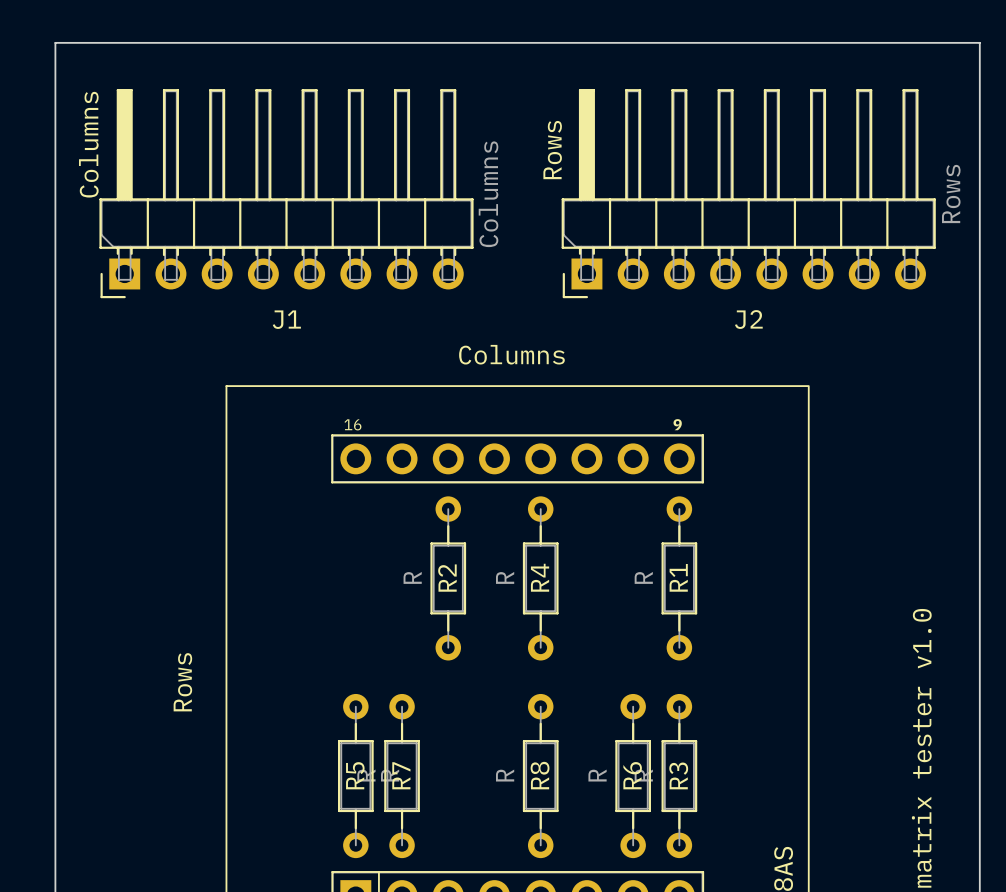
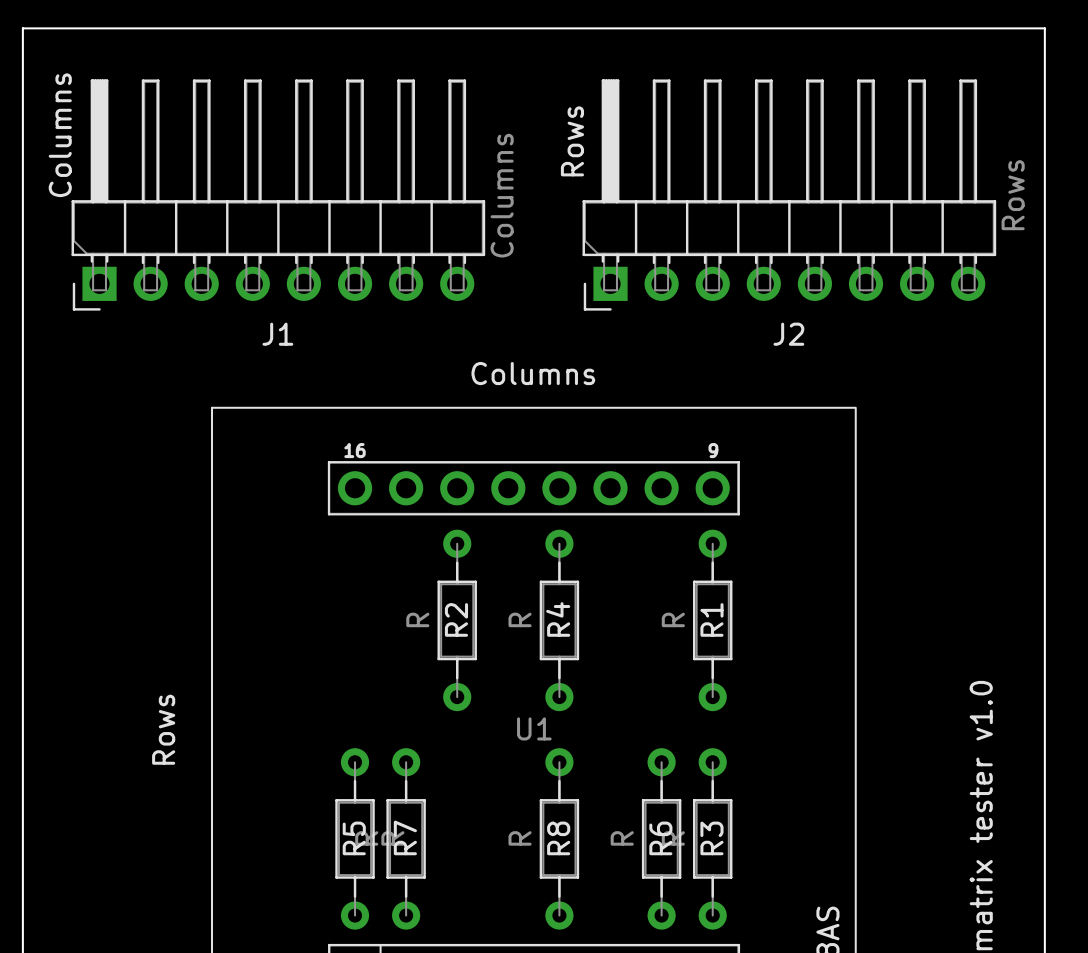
part text: none -> U1 (534, 728)

